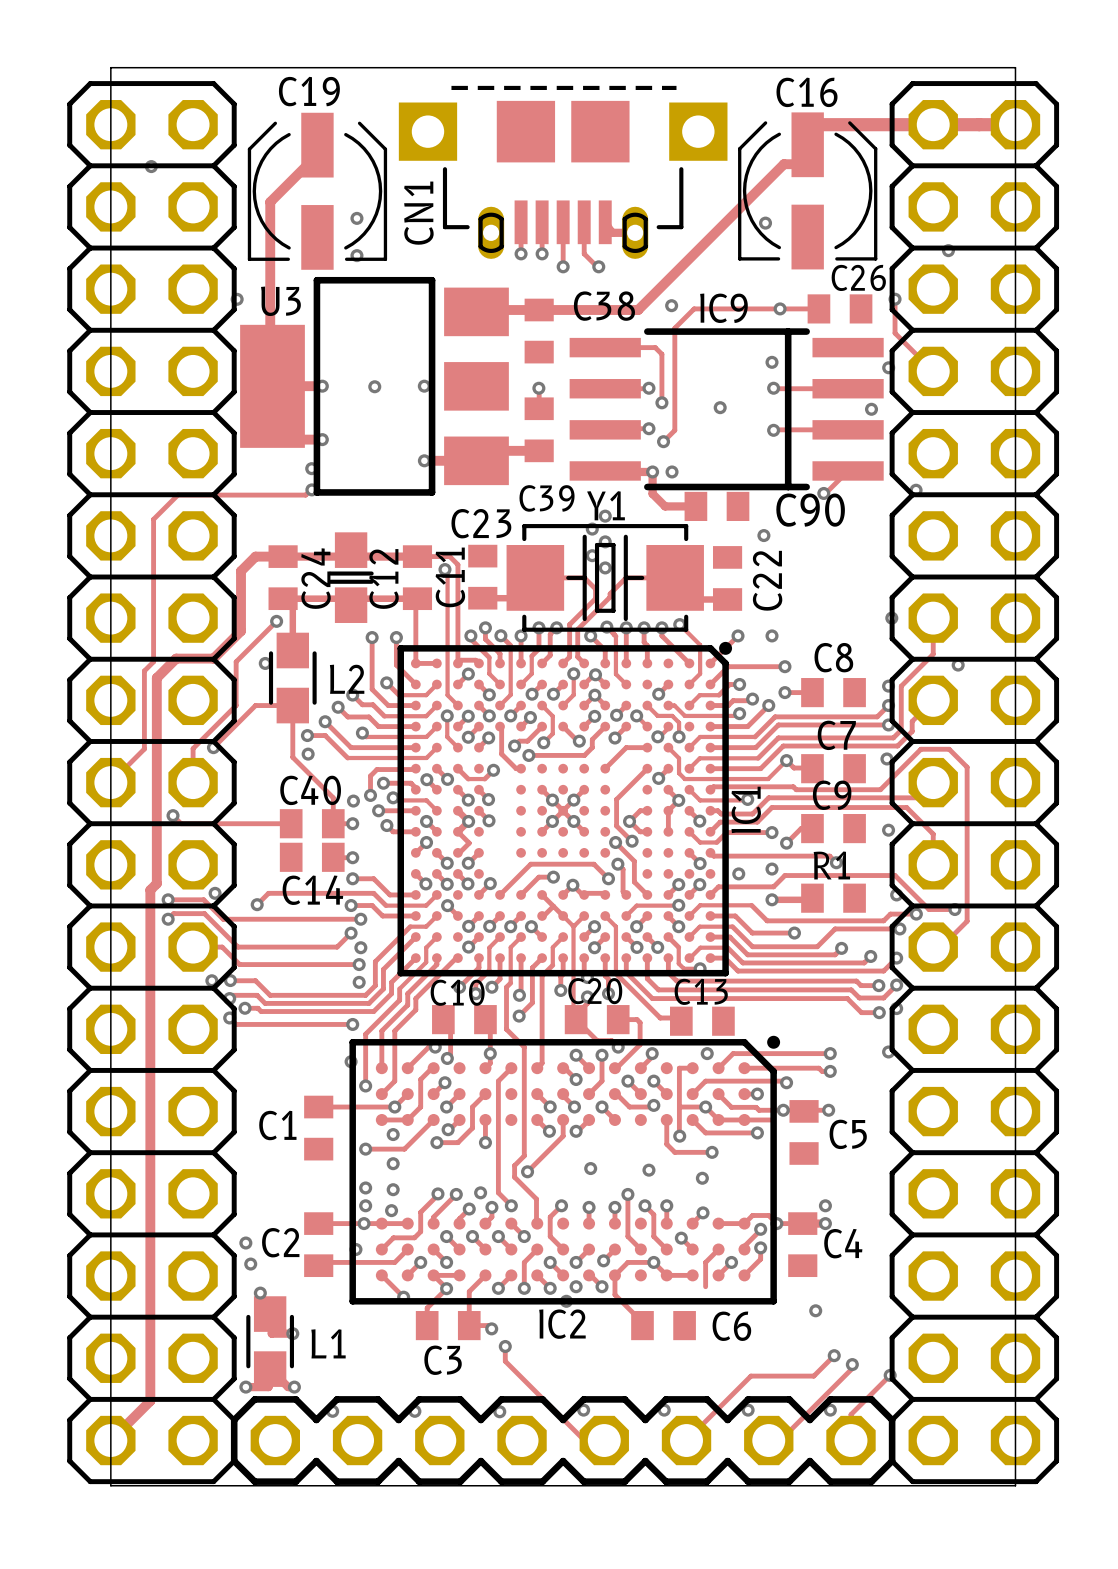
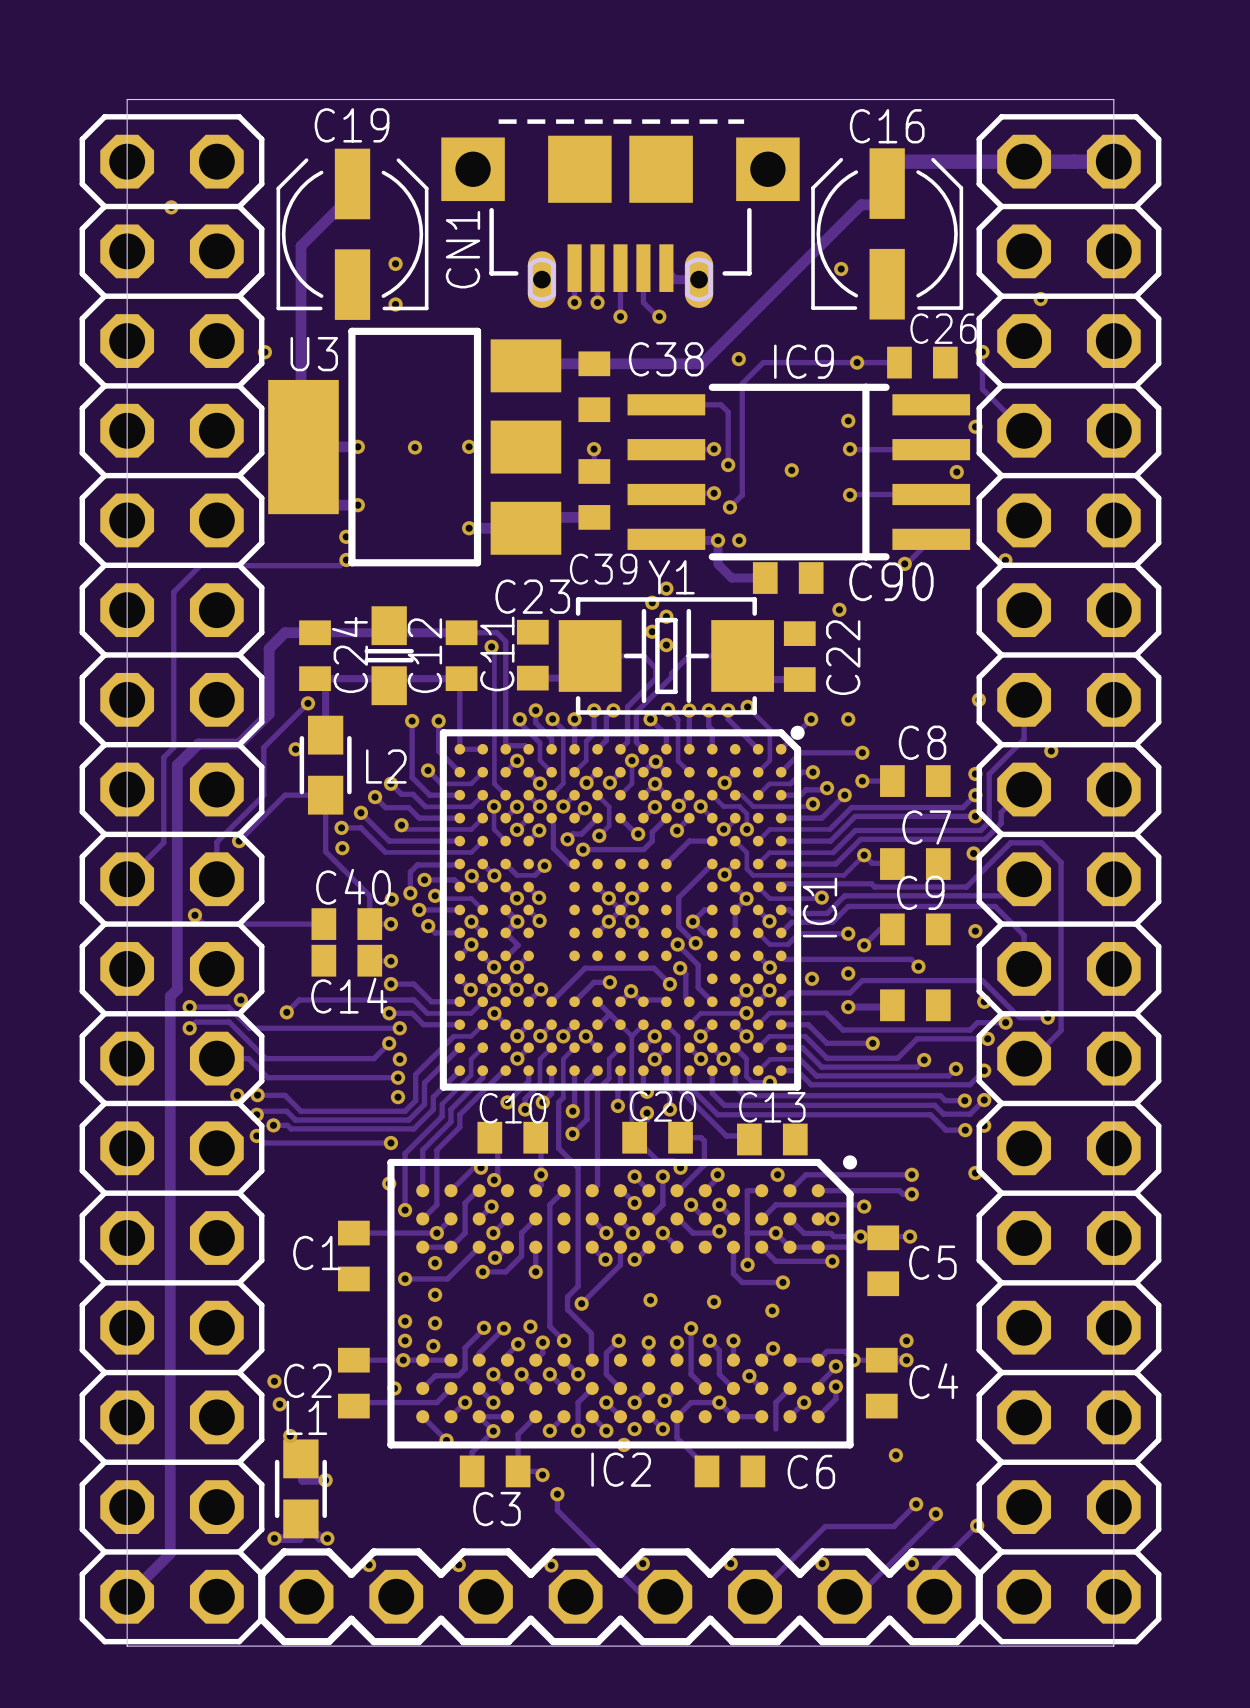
R1 name: R1 (831, 865) -> none
L1 name position: L1 (328, 1343) -> L1 (306, 1417)

